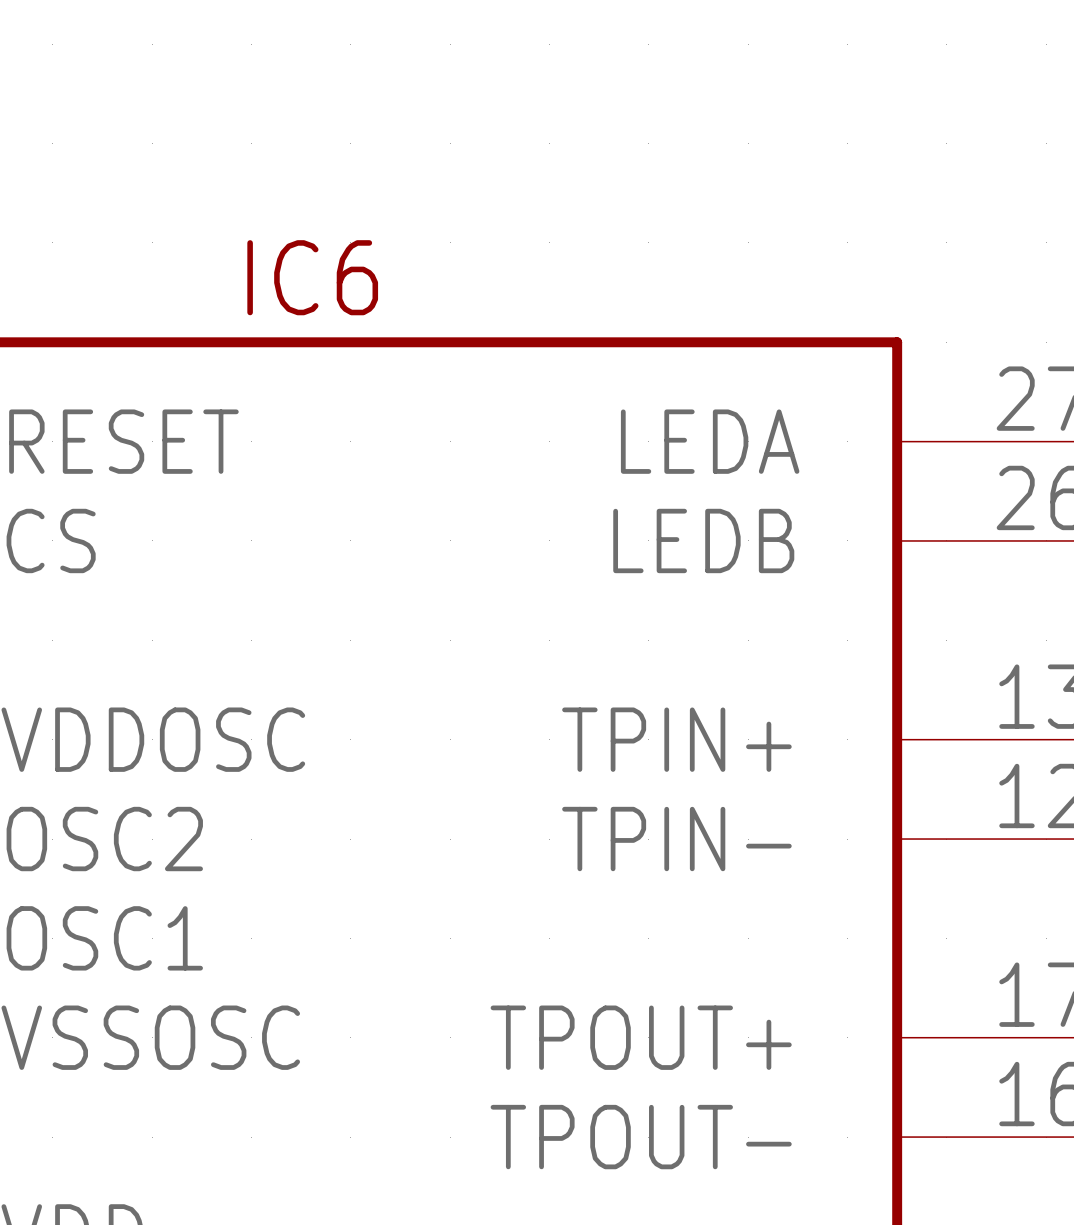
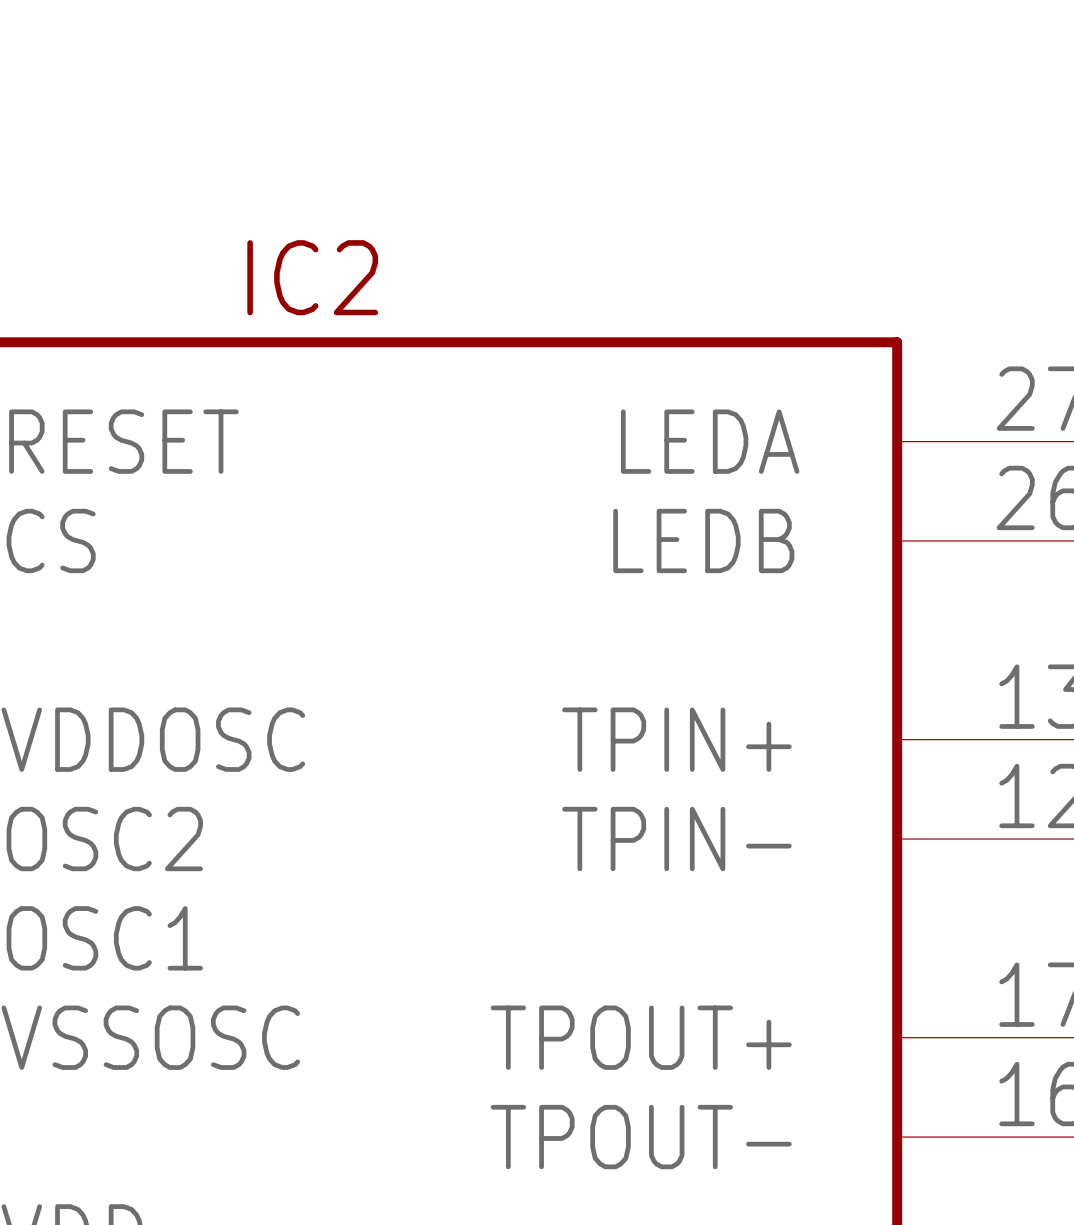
IC6 name: IC6 (312, 277) -> IC2 (312, 277)

